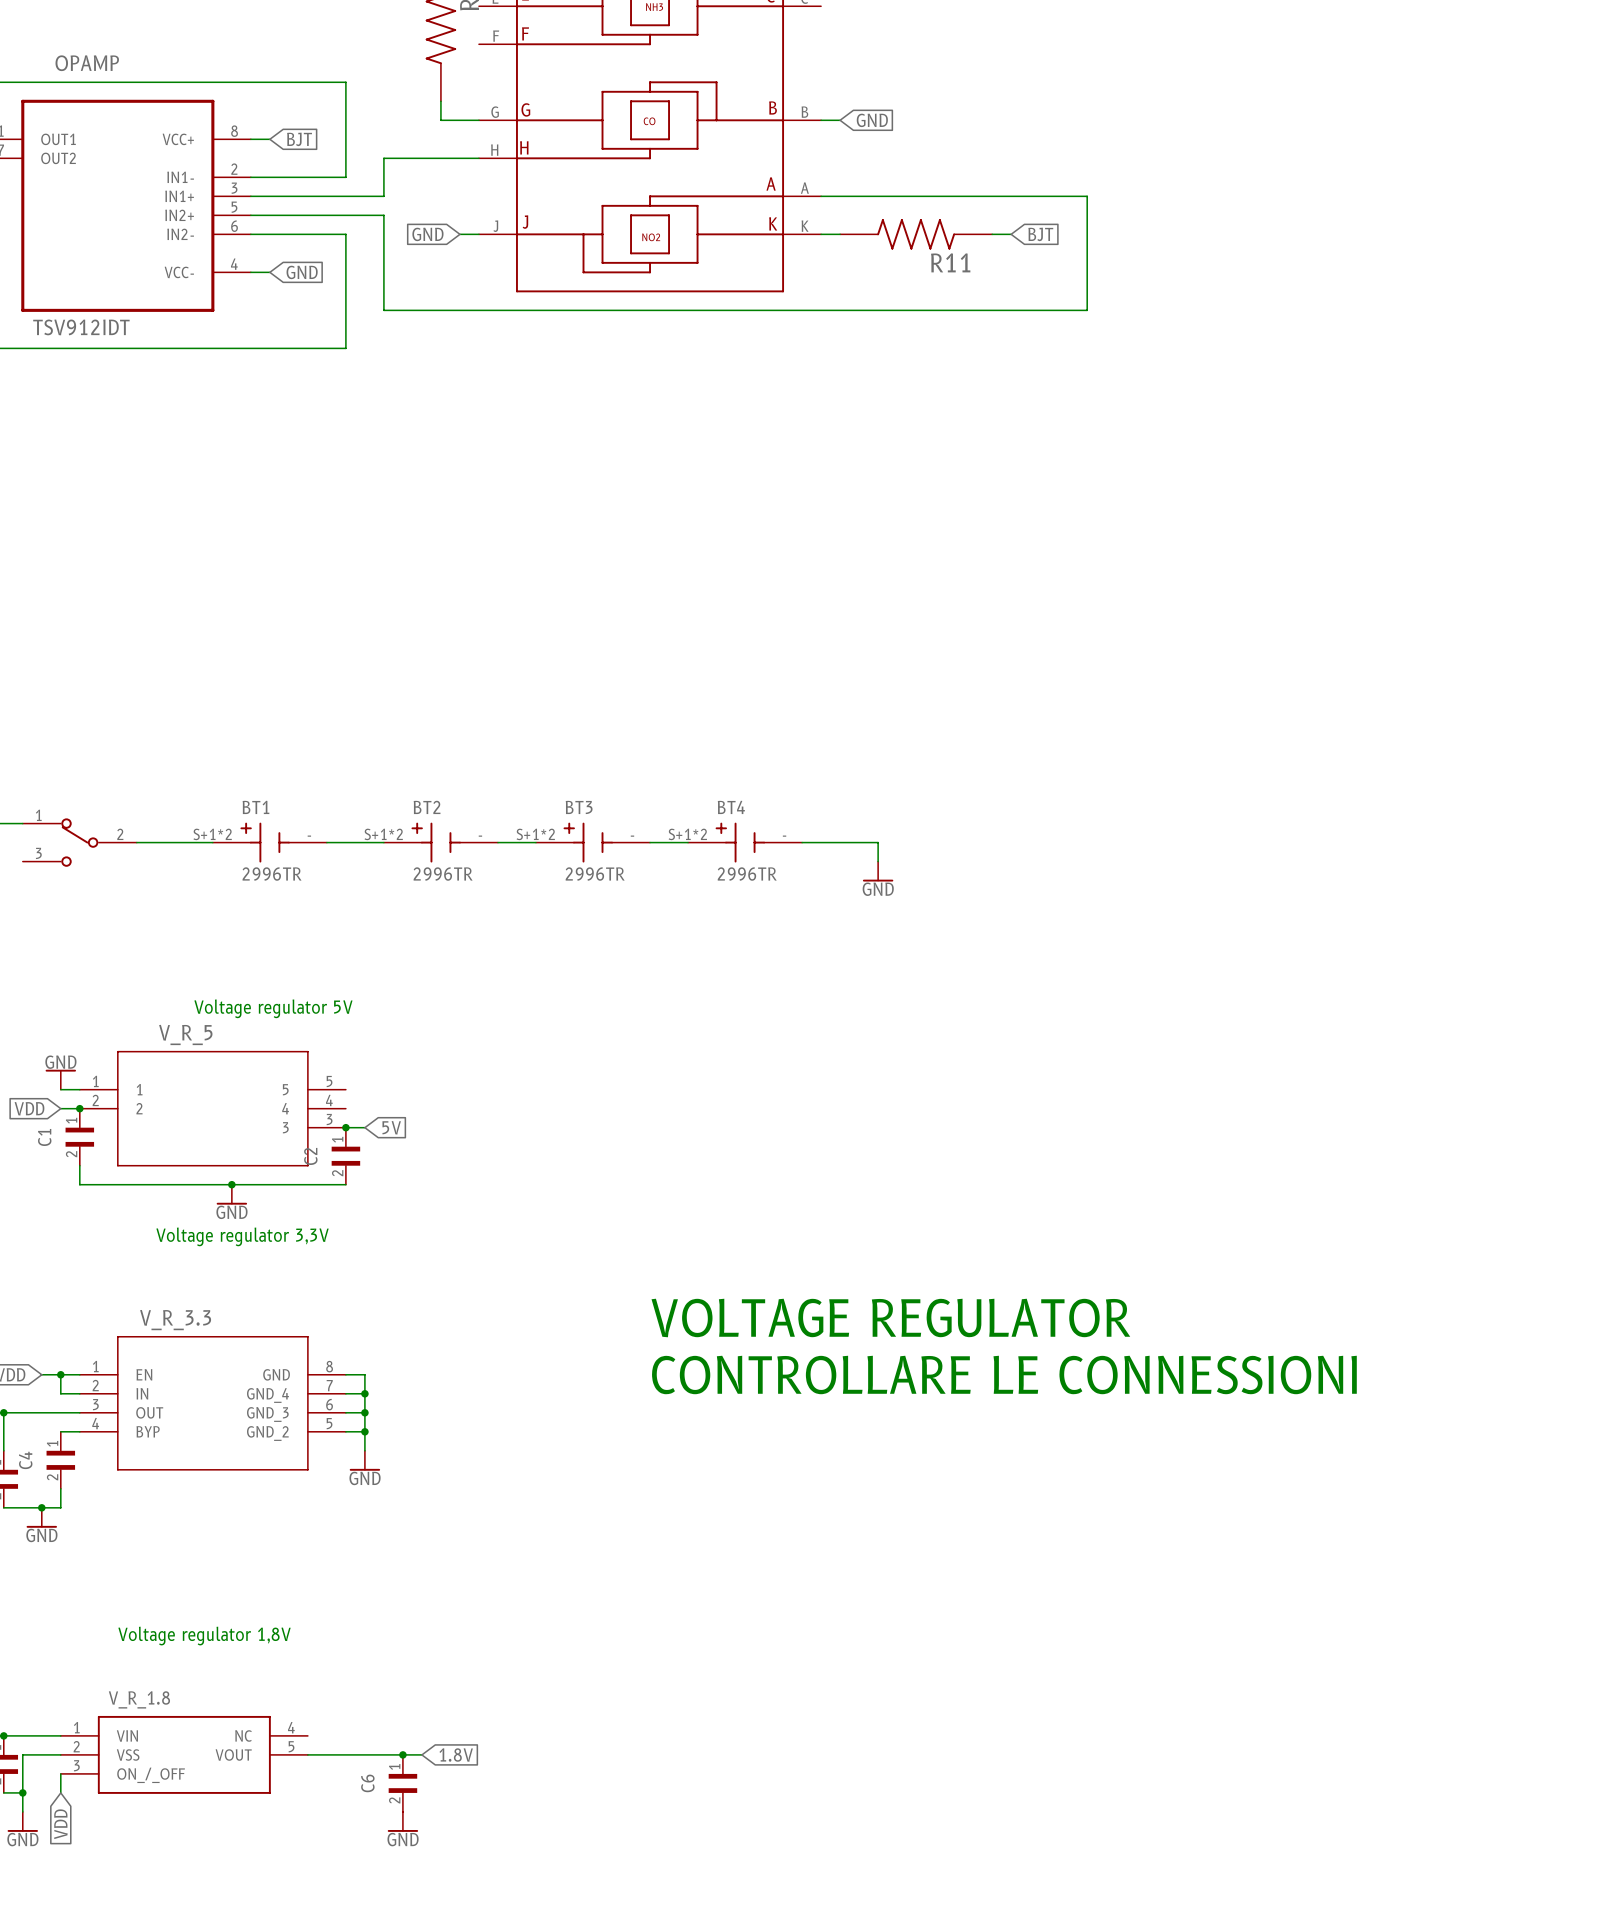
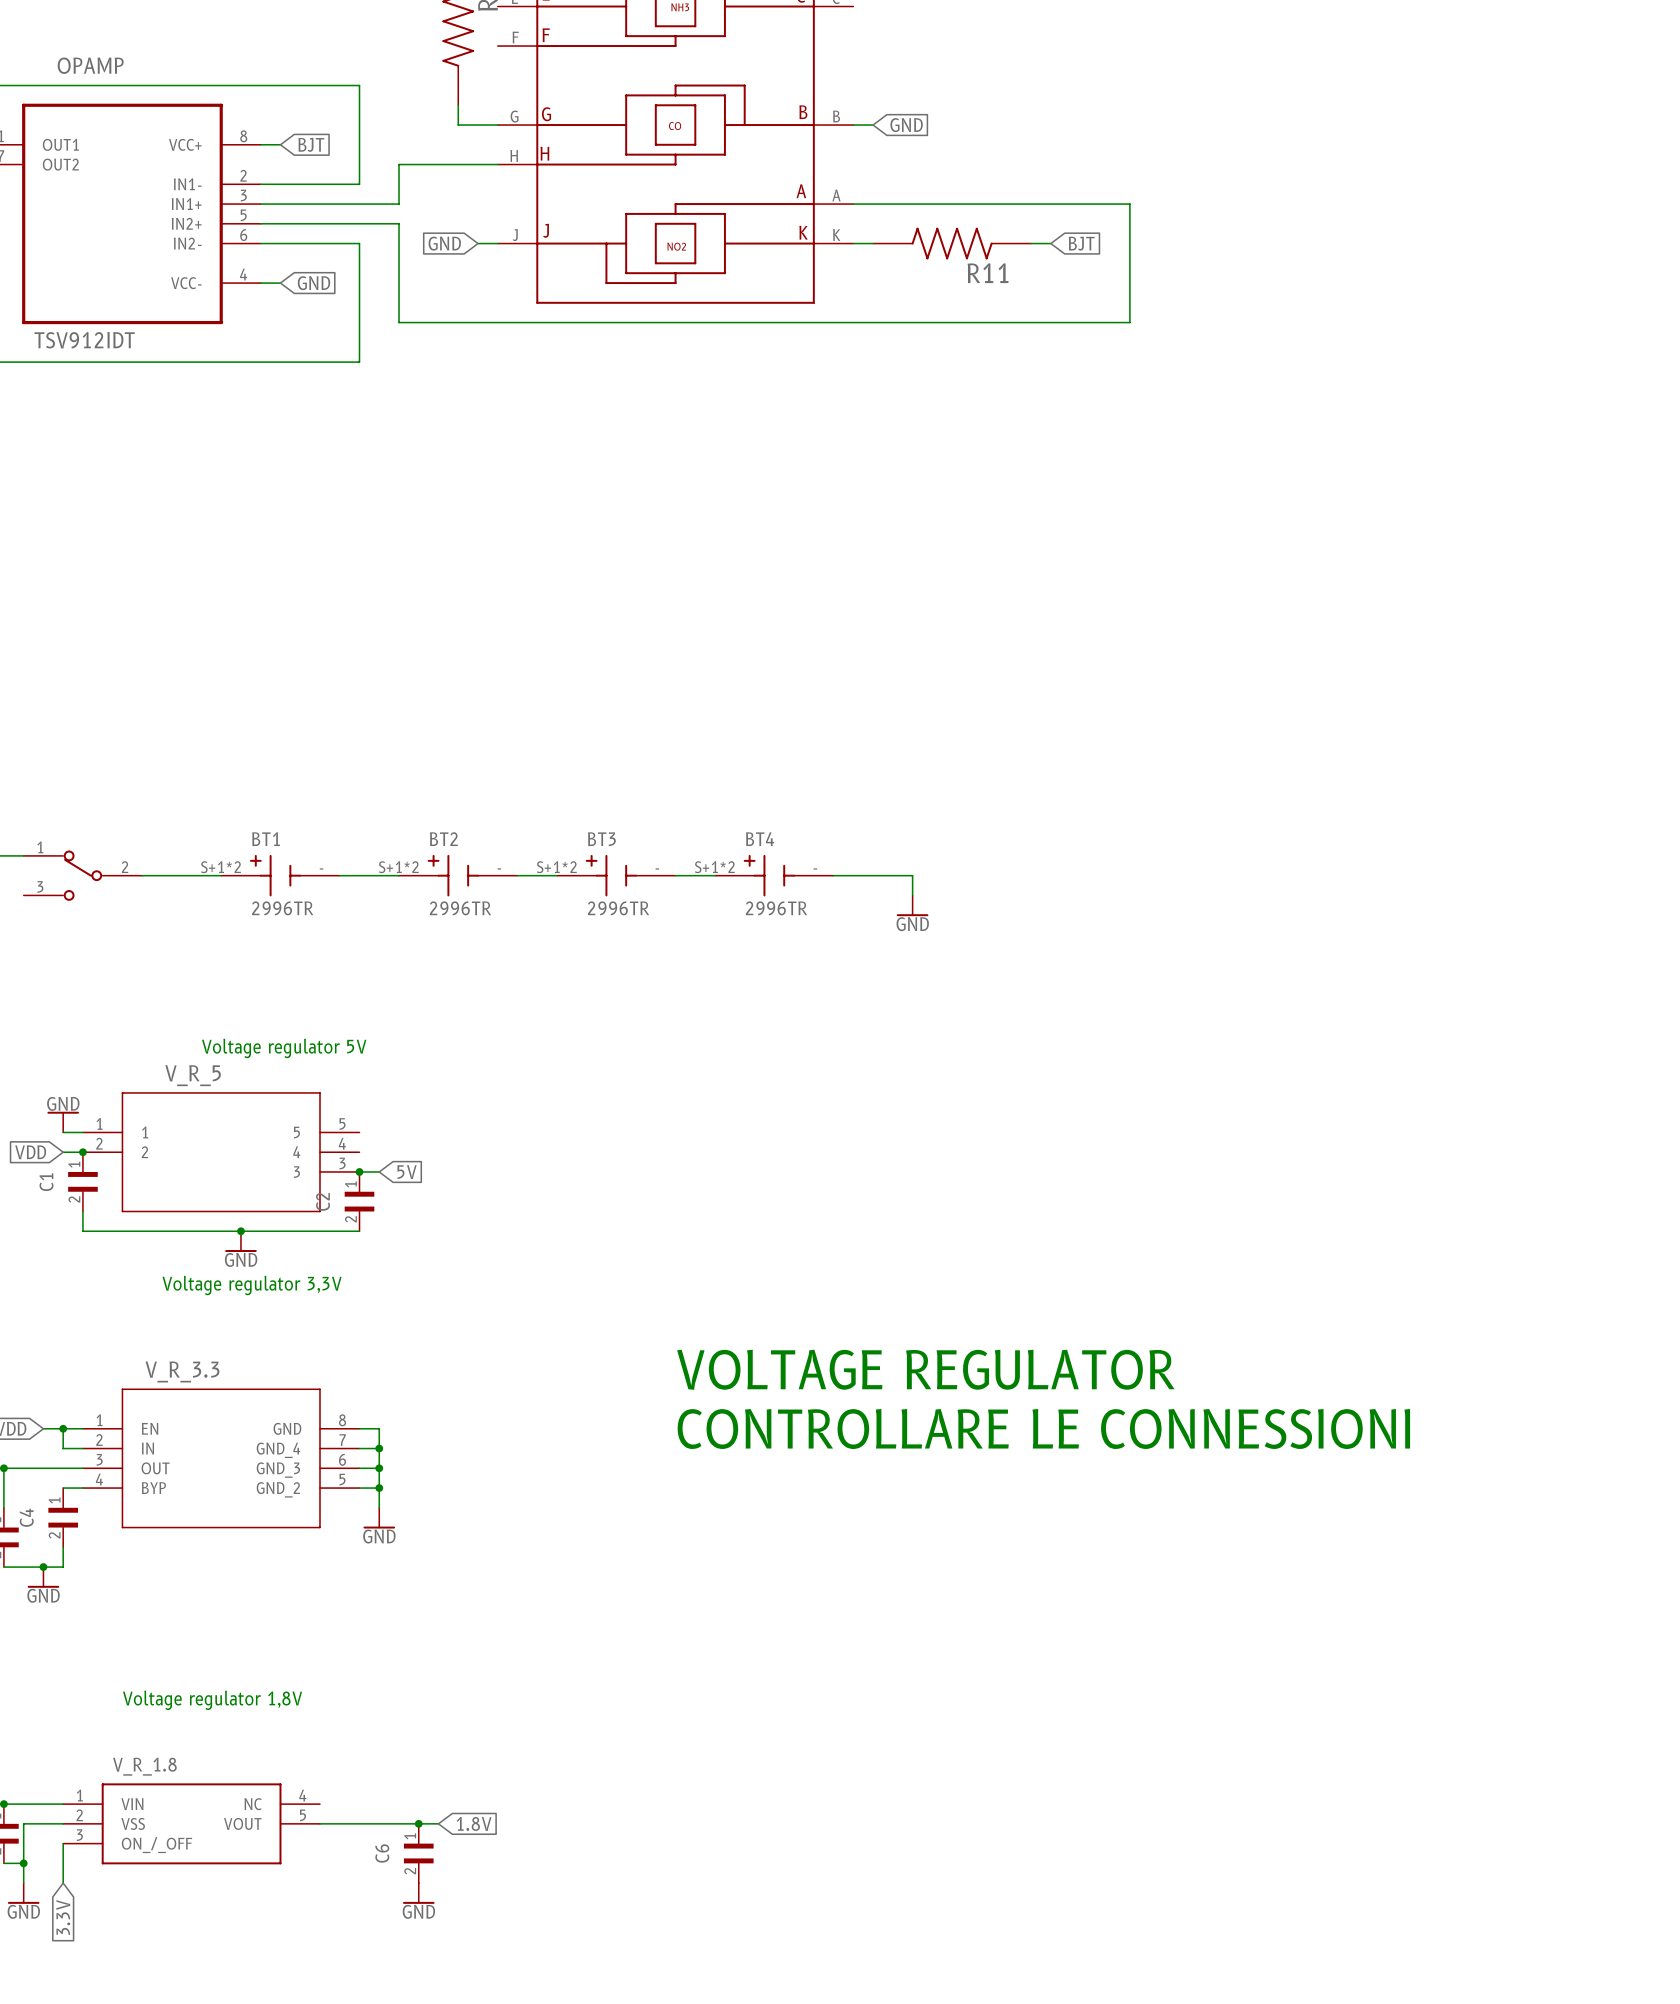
wire: none -> (63, 1863) (63, 1883)
global label: VDD (60, 1824) -> none
global label: none -> 3.3V (63, 1917)

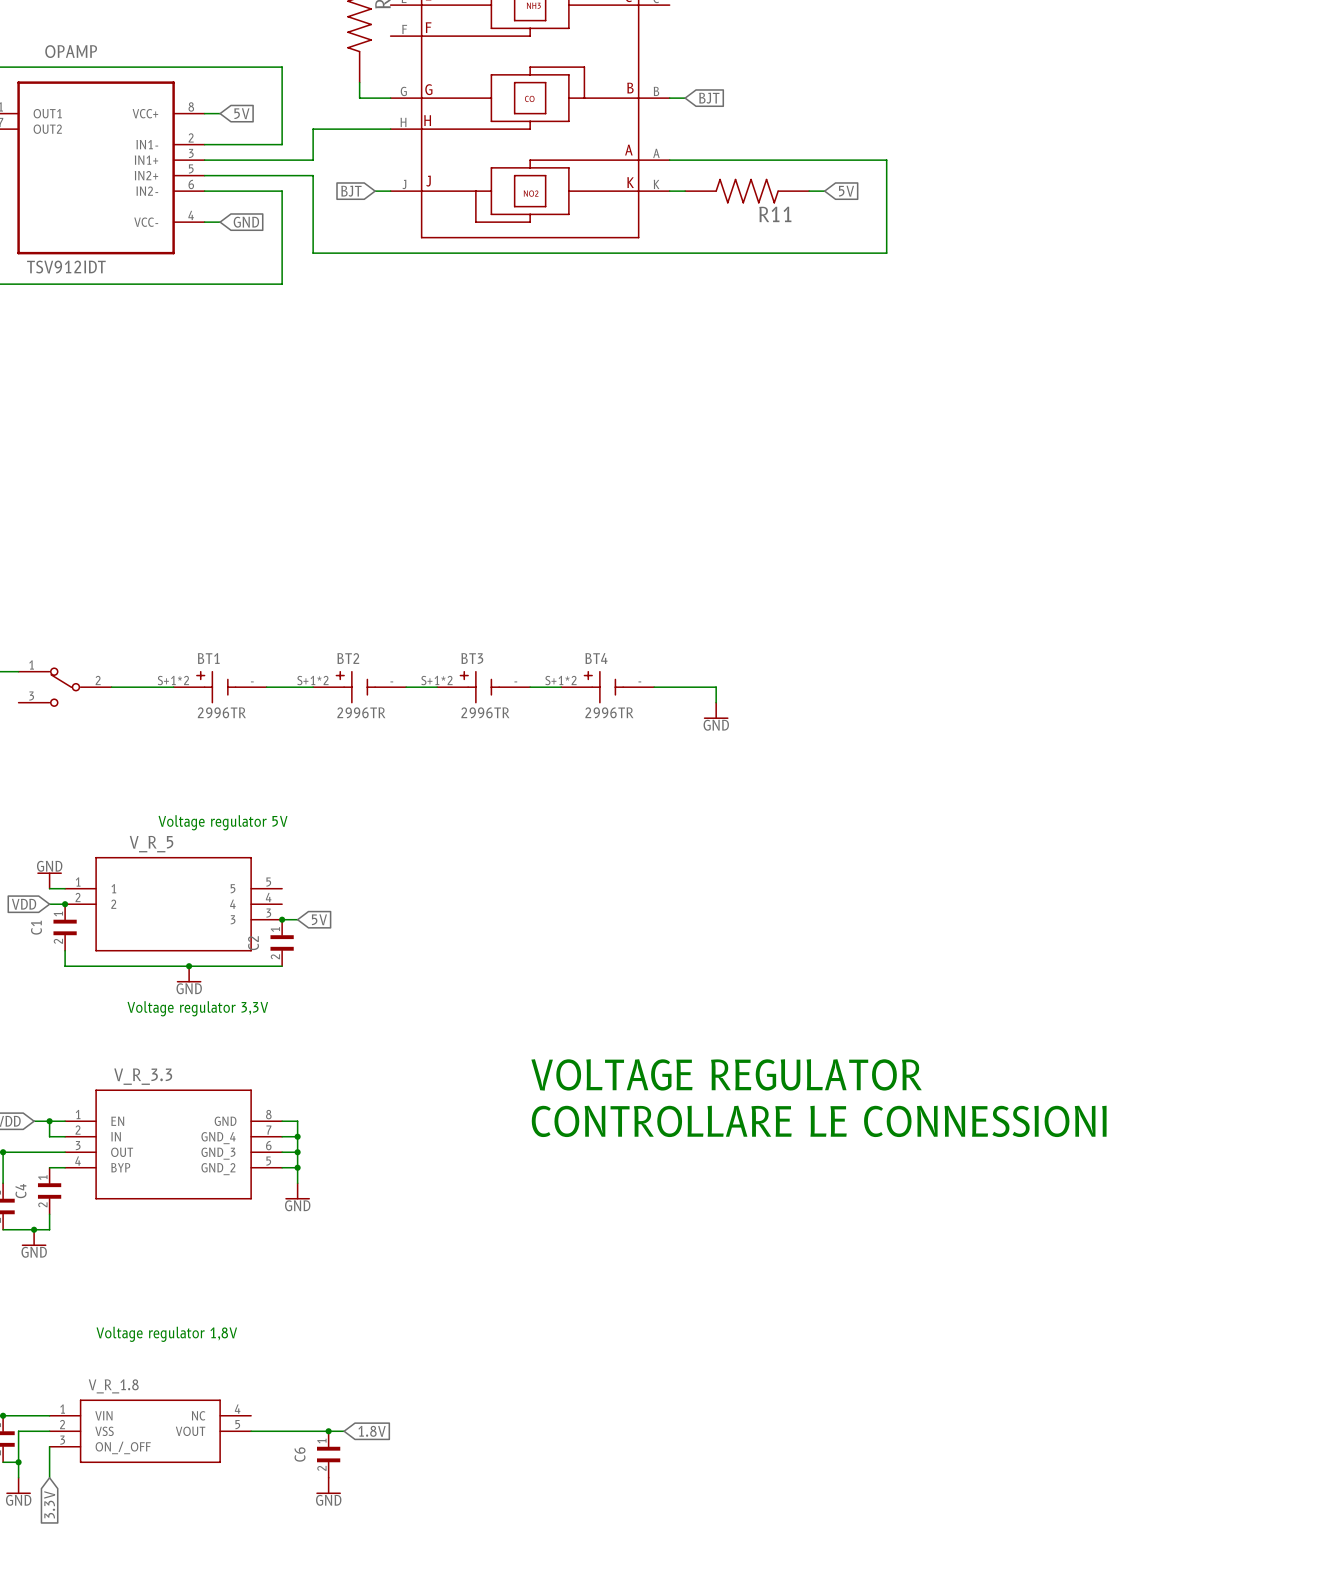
global label: GND (906, 125) -> BJT (709, 98)
global label: BJT (311, 144) -> 5V (241, 113)
global label: GND (444, 243) -> BJT (351, 191)
global label: BJT (1081, 243) -> 5V (846, 191)

